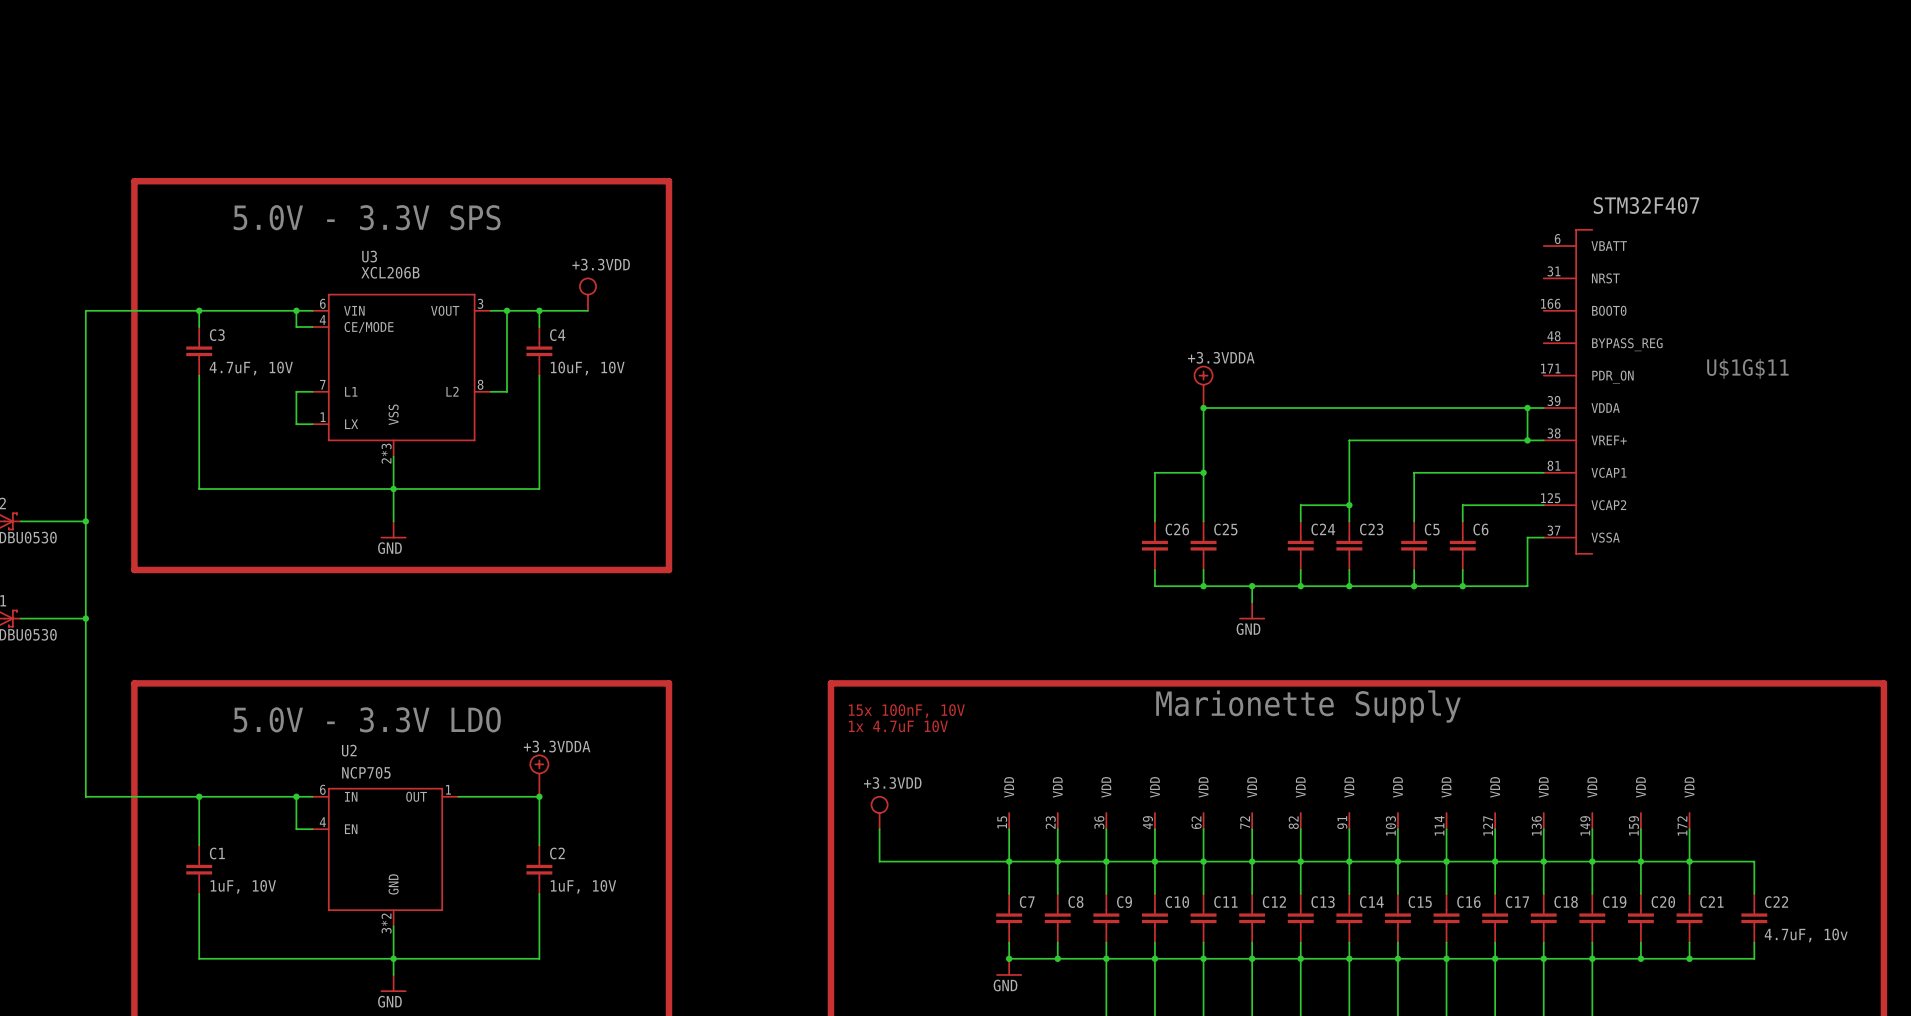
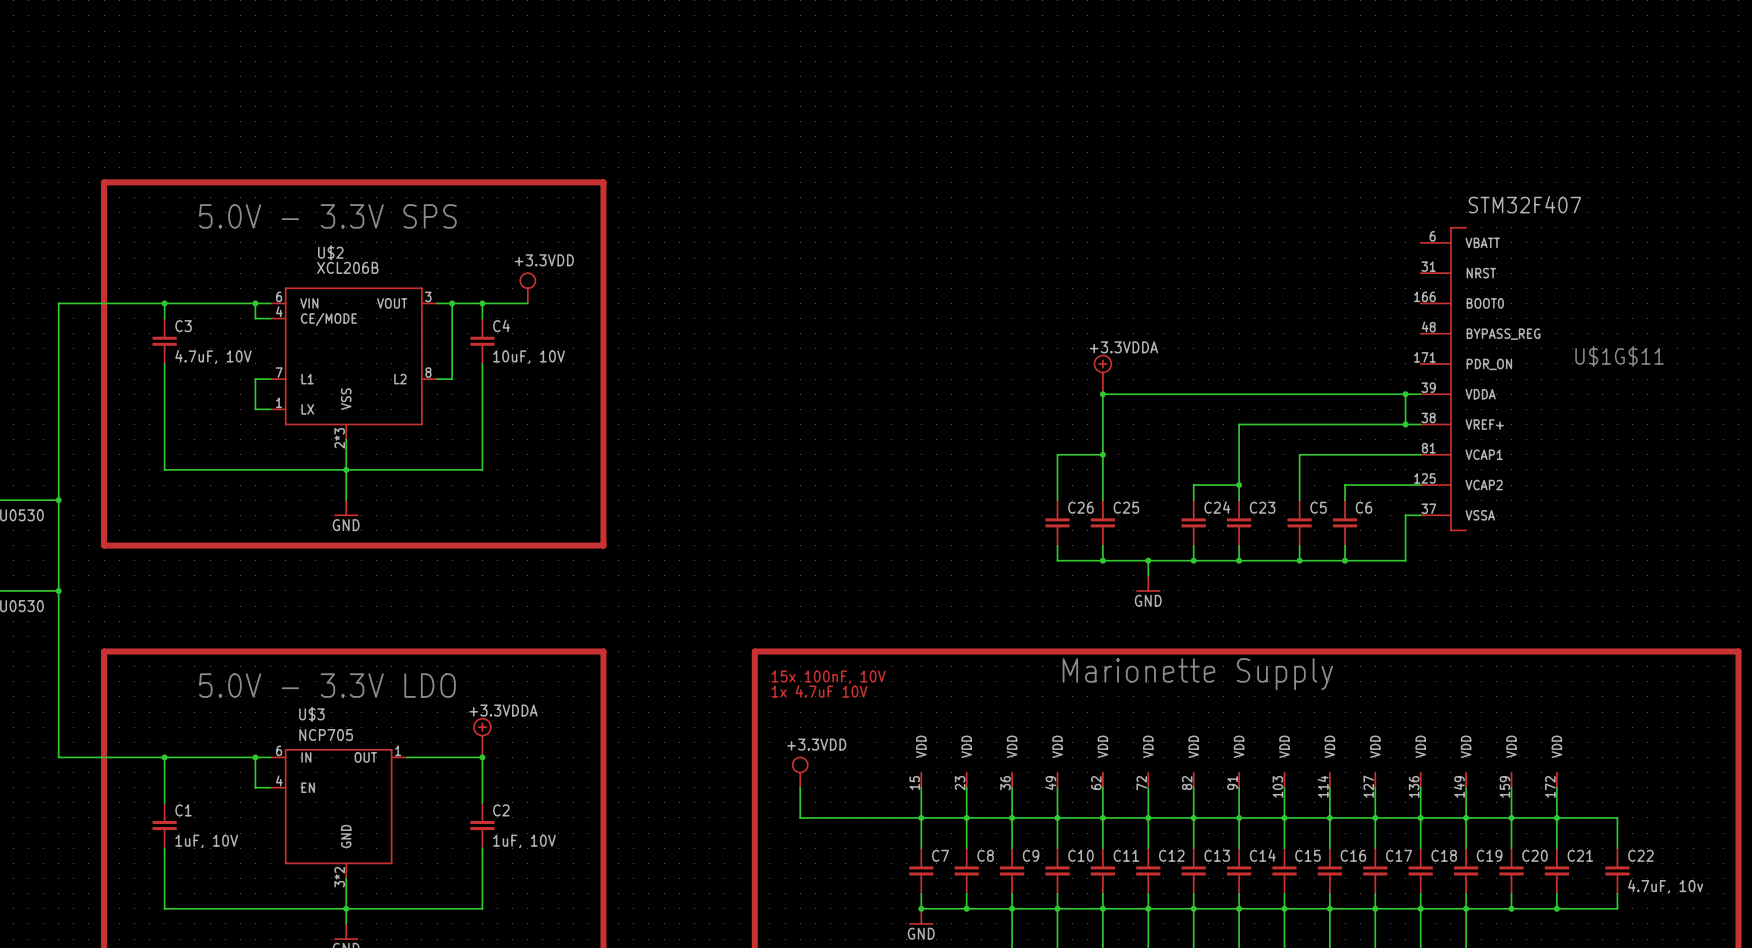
U3 name: U3 (369, 256) -> U$2 (330, 252)
U2 name: U2 (349, 750) -> U$3 (311, 714)

